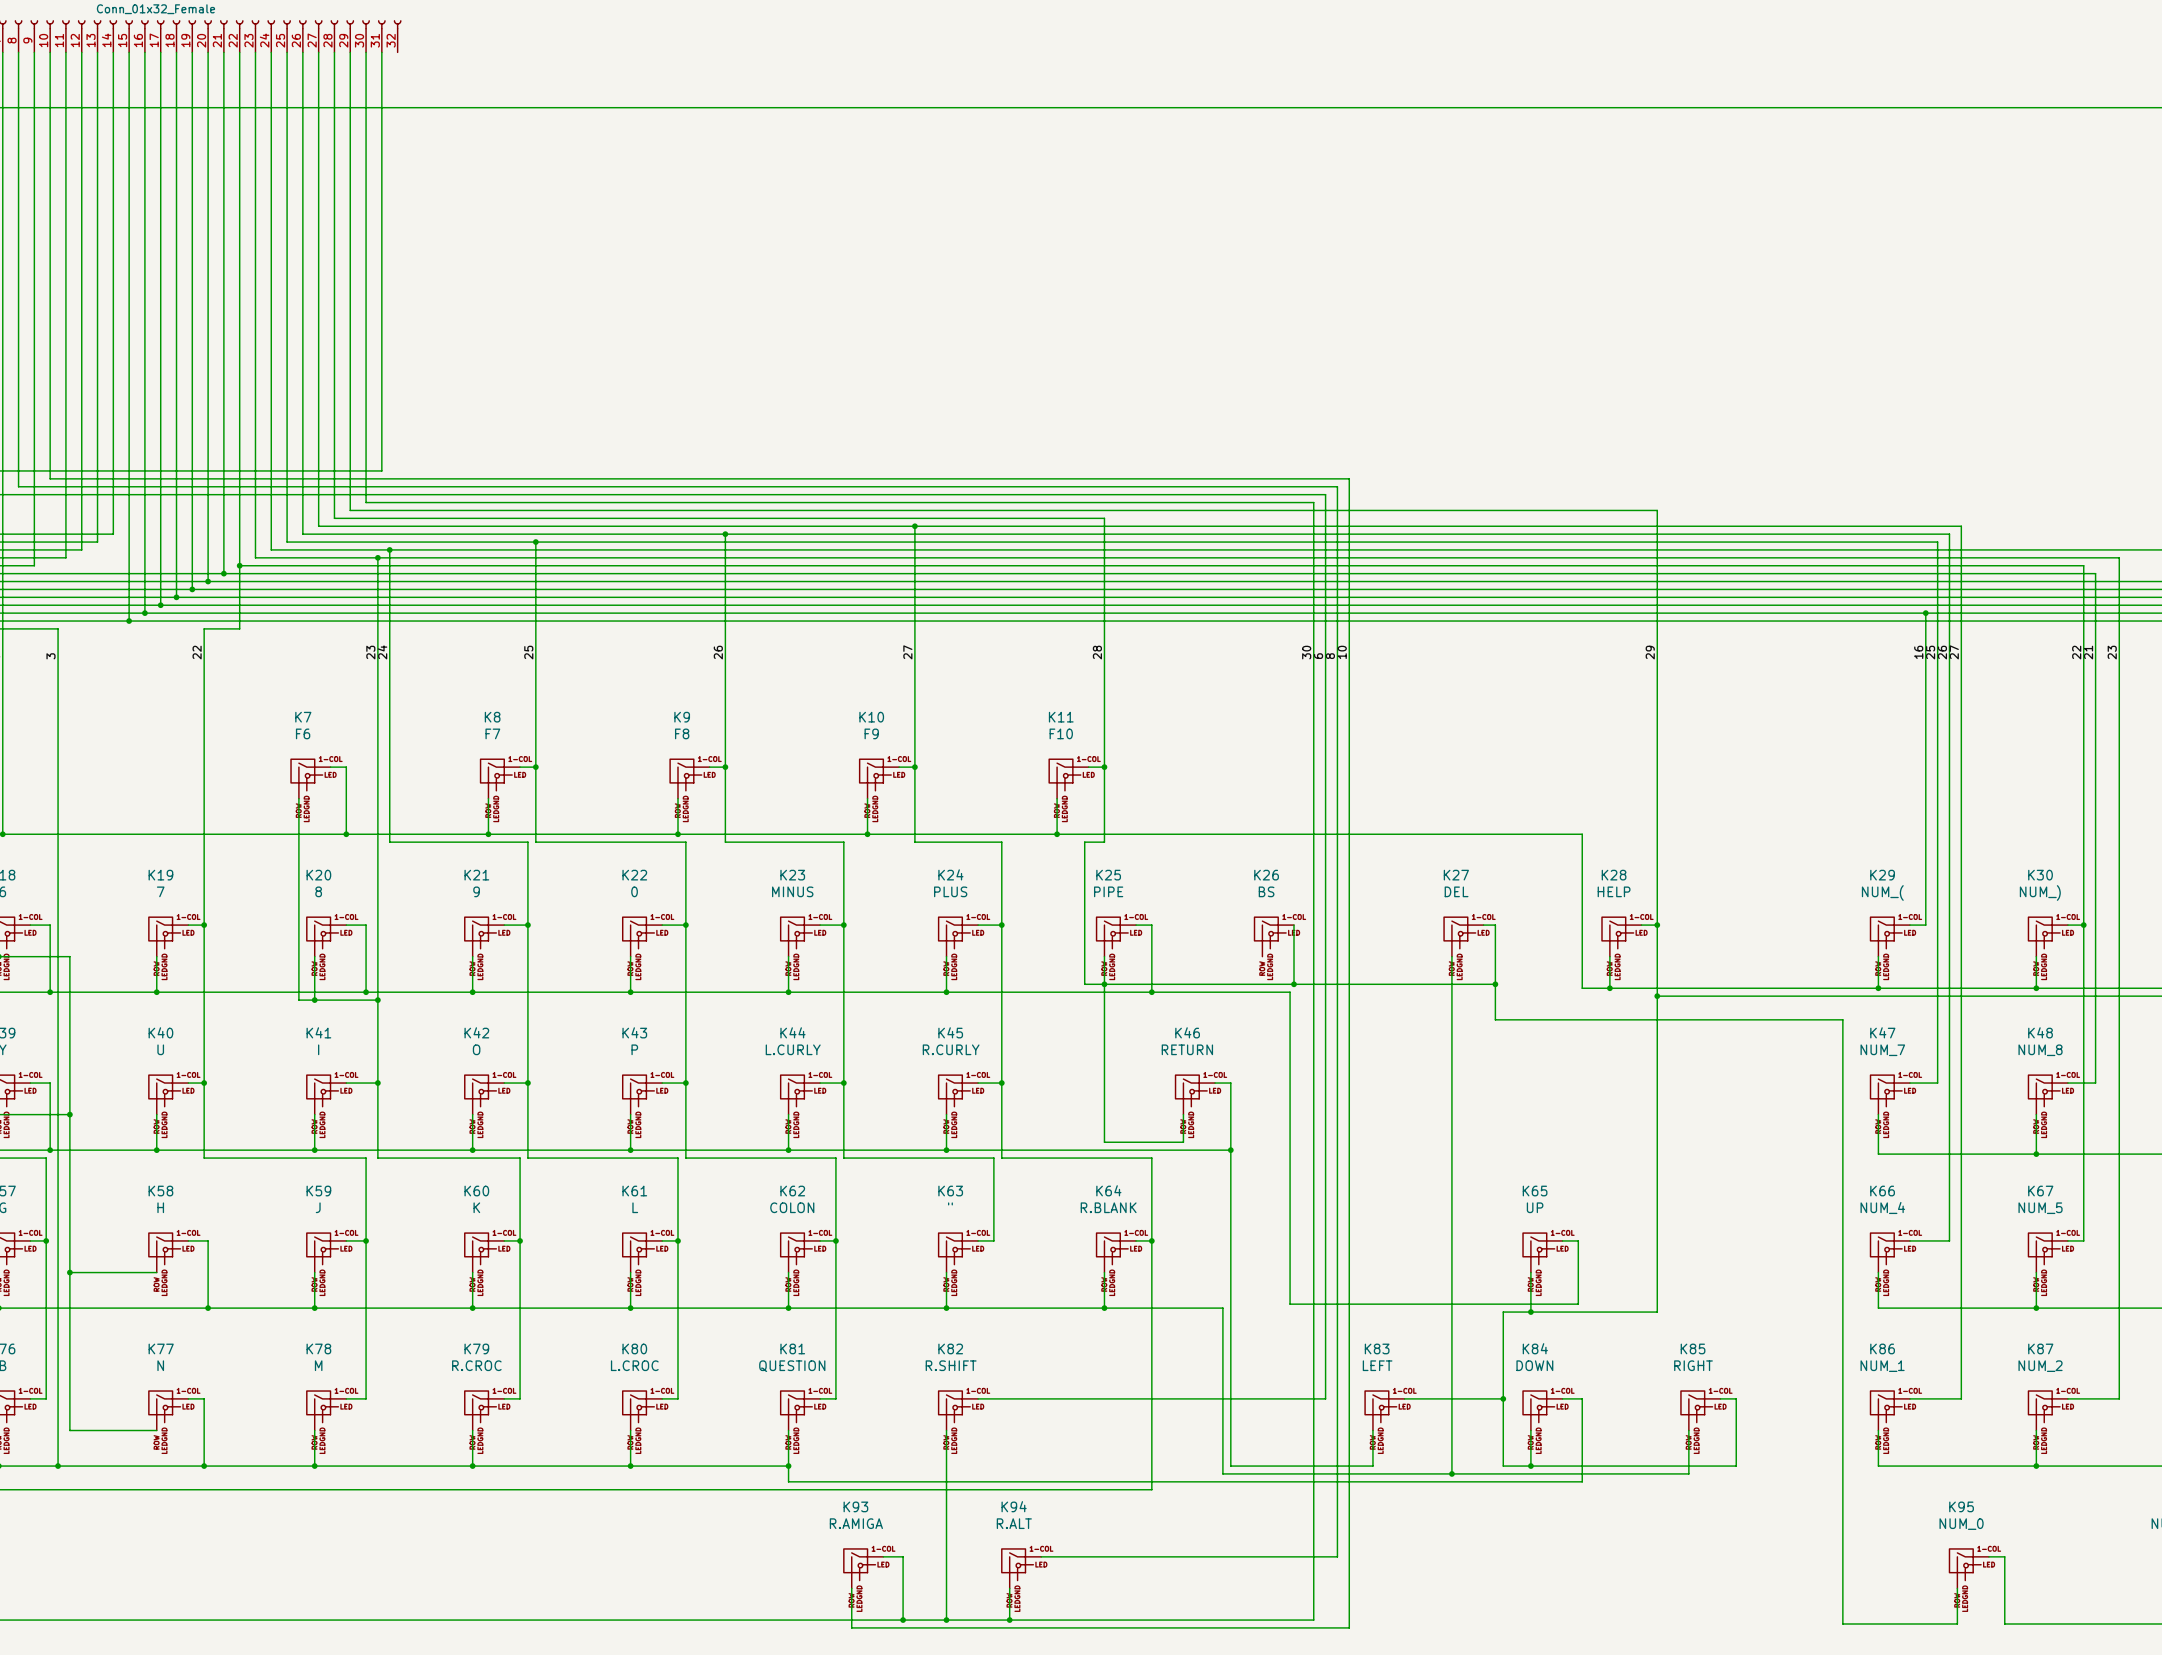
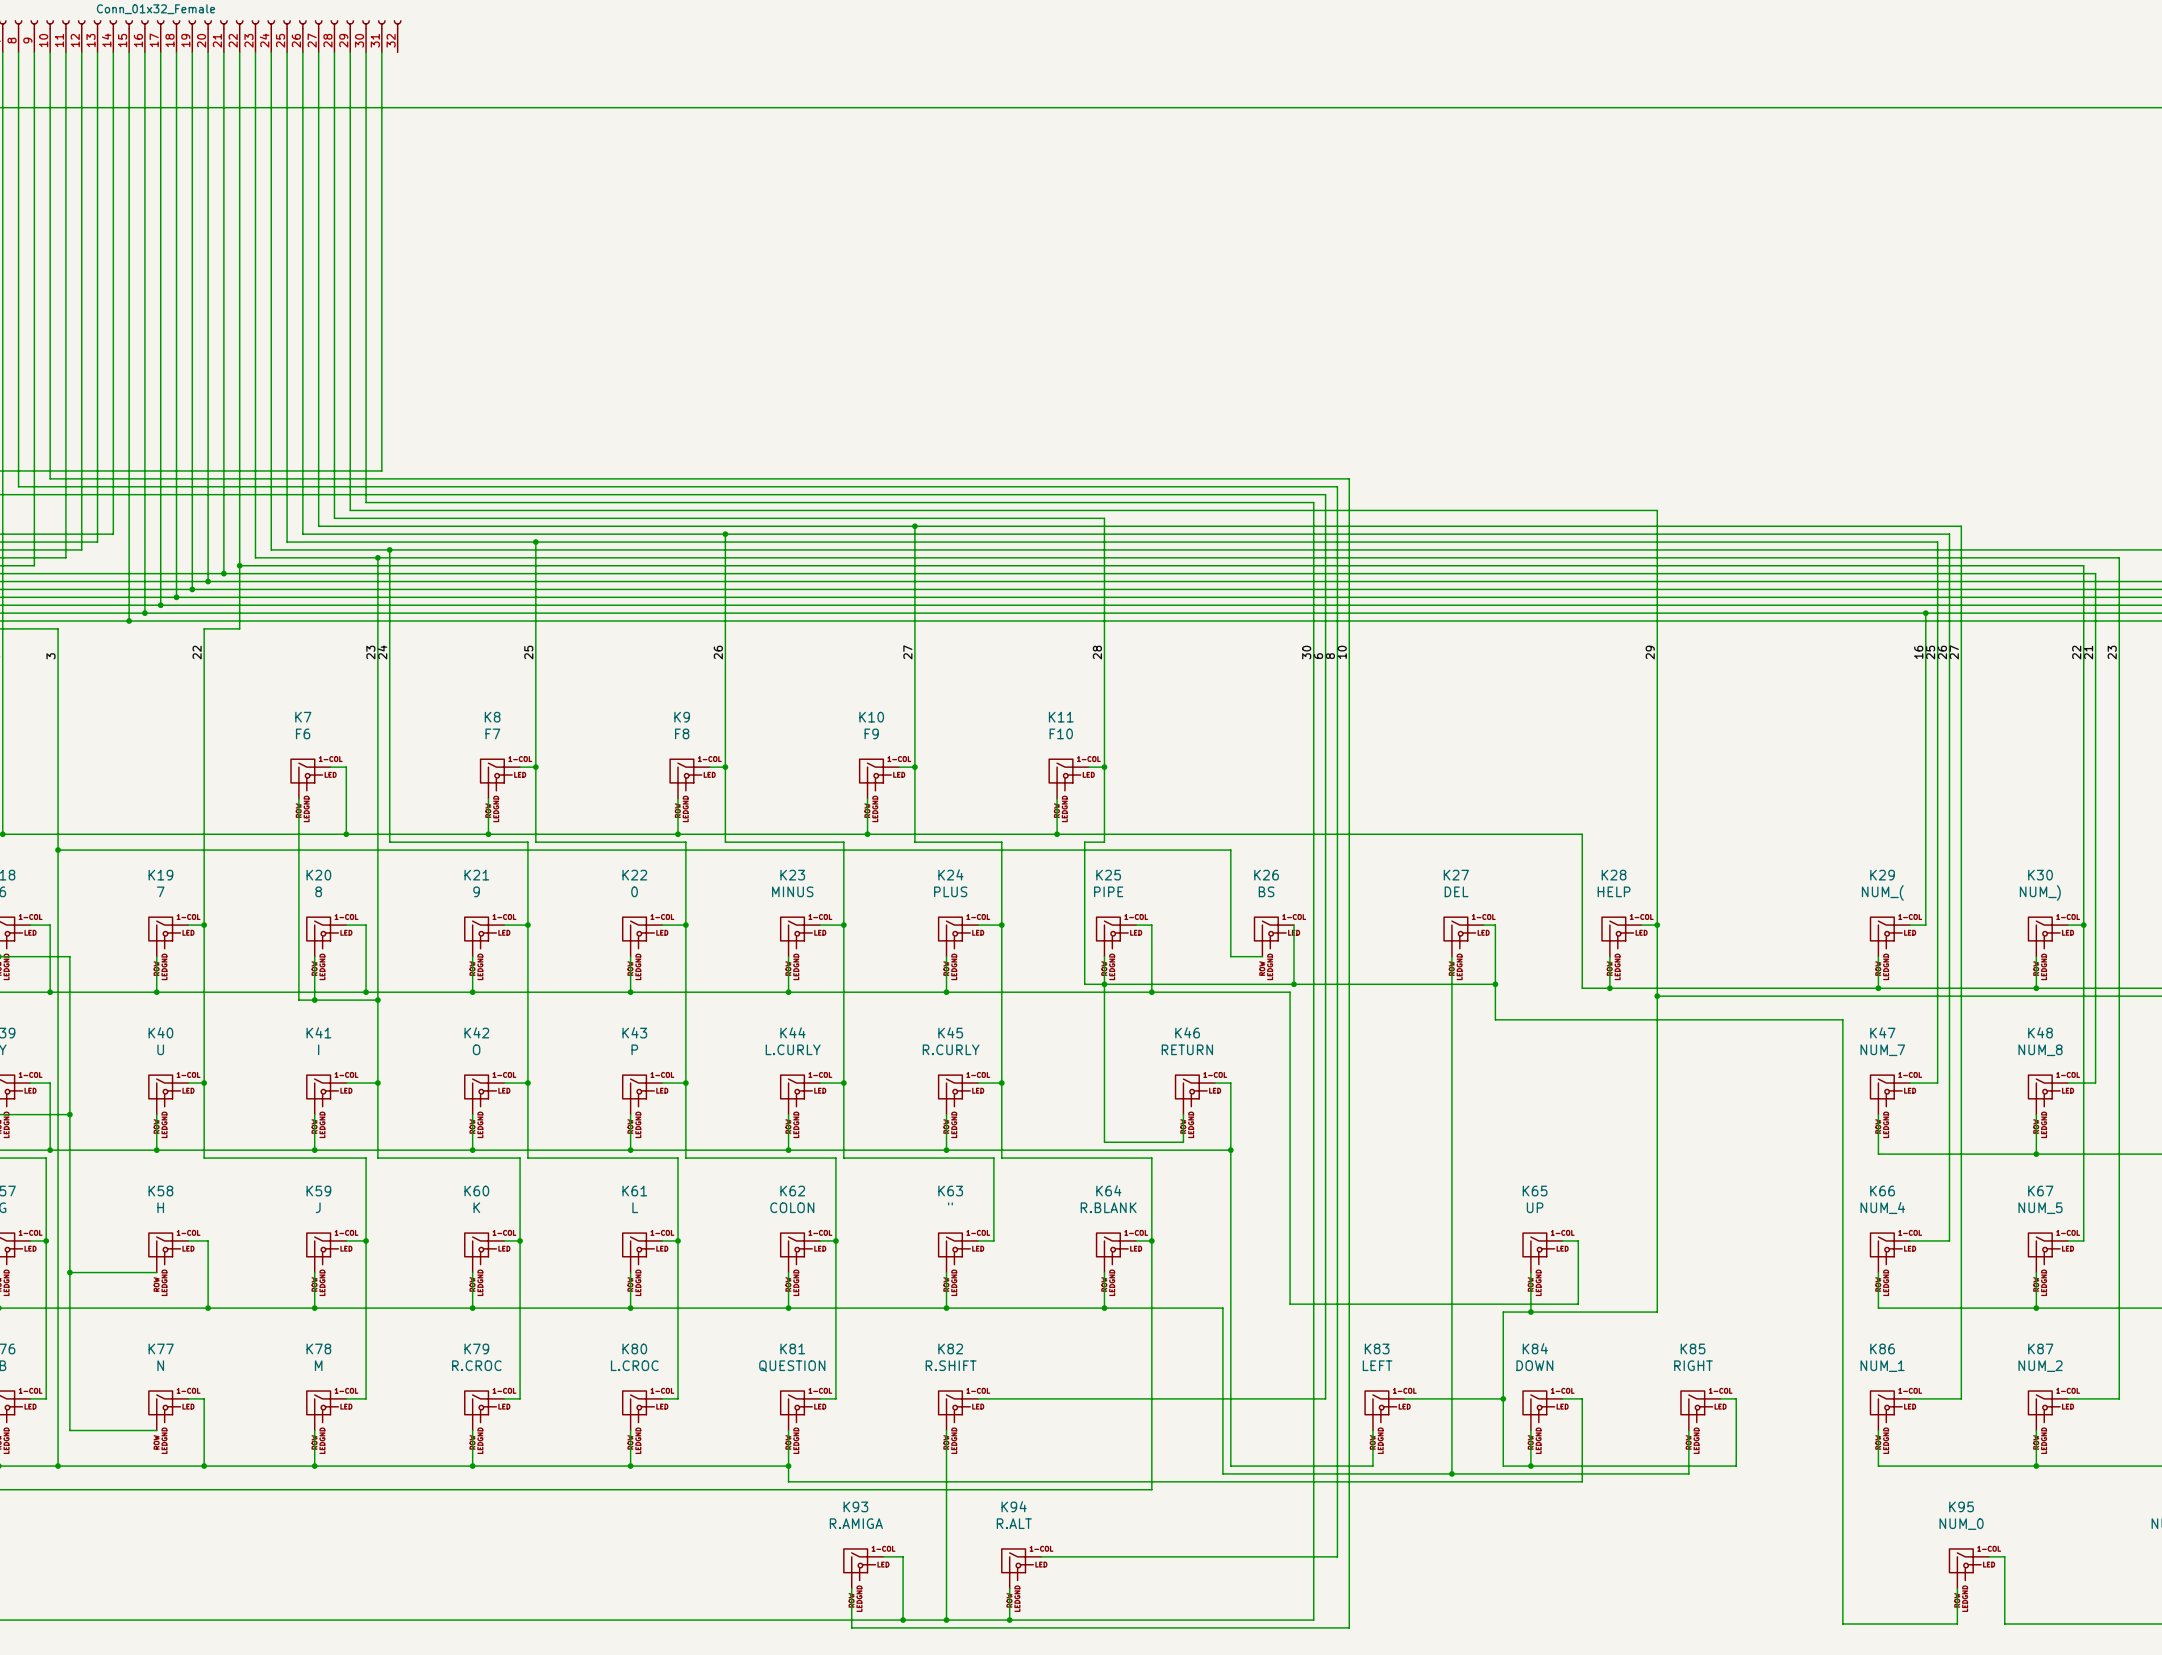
wire: none -> (58, 850) (1230, 850) (1230, 956) (1262, 956)
junction: none -> (58, 850)

